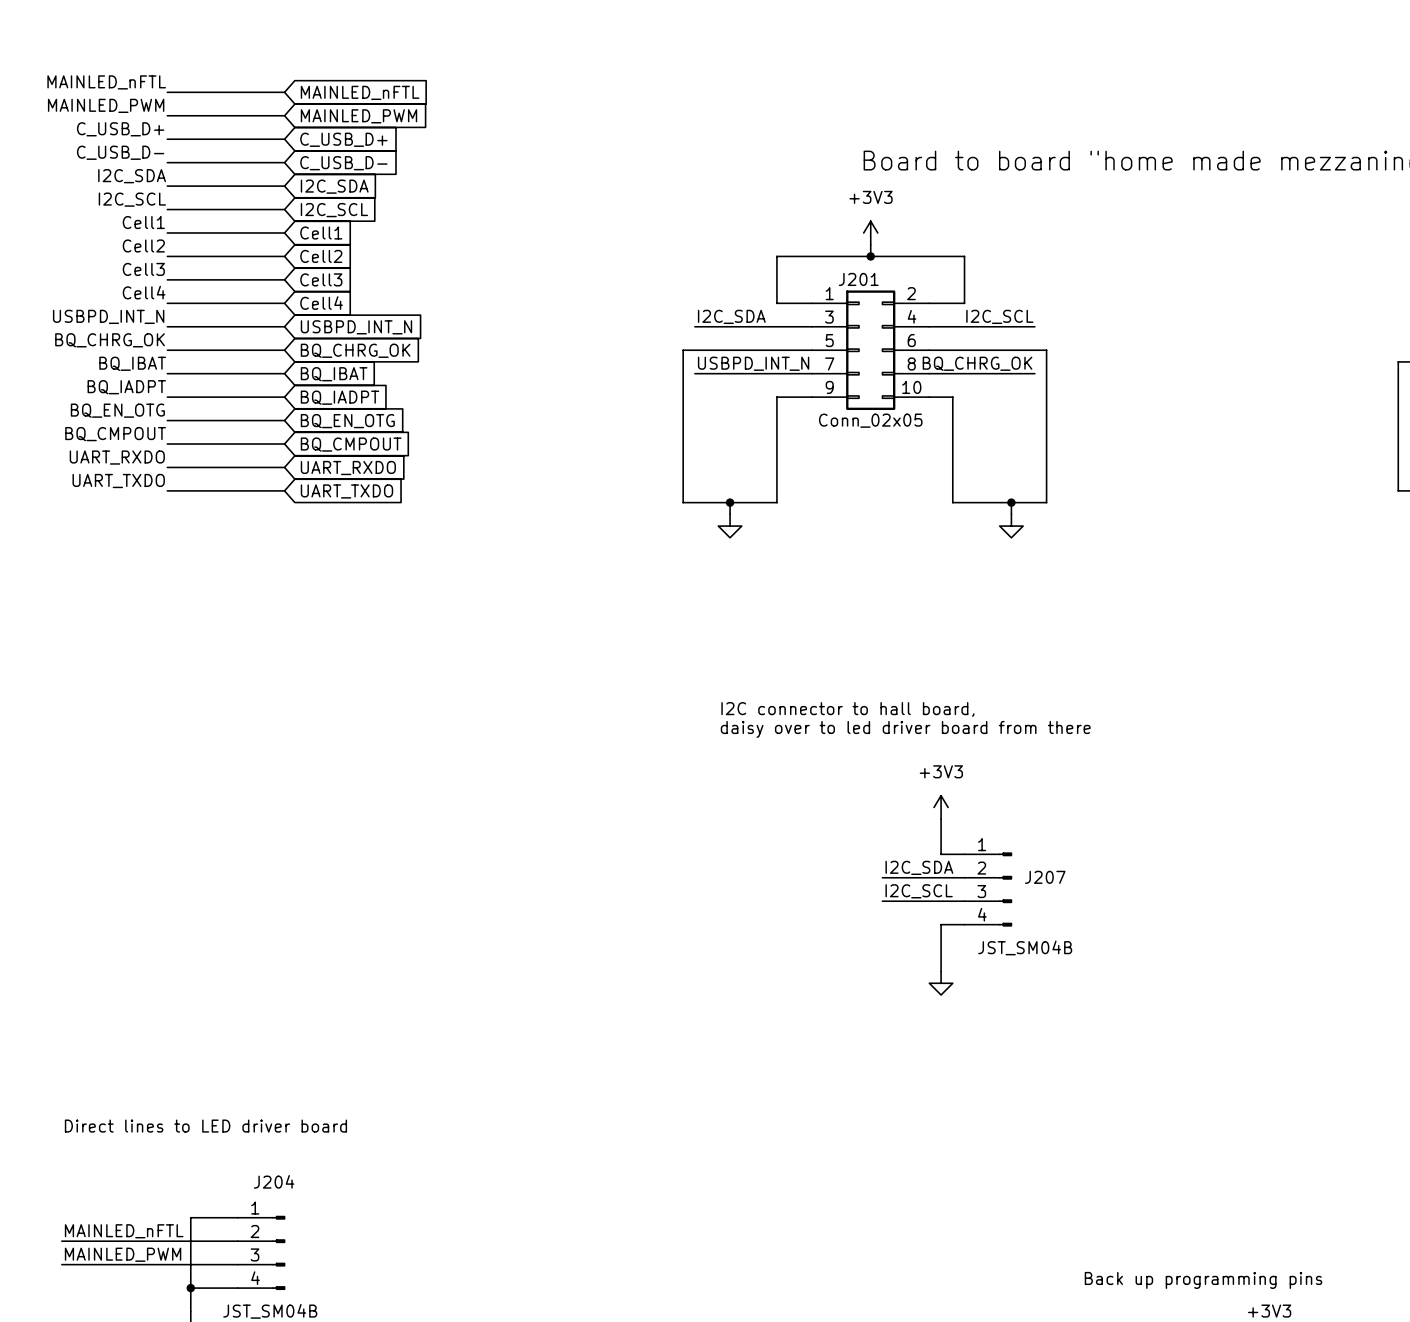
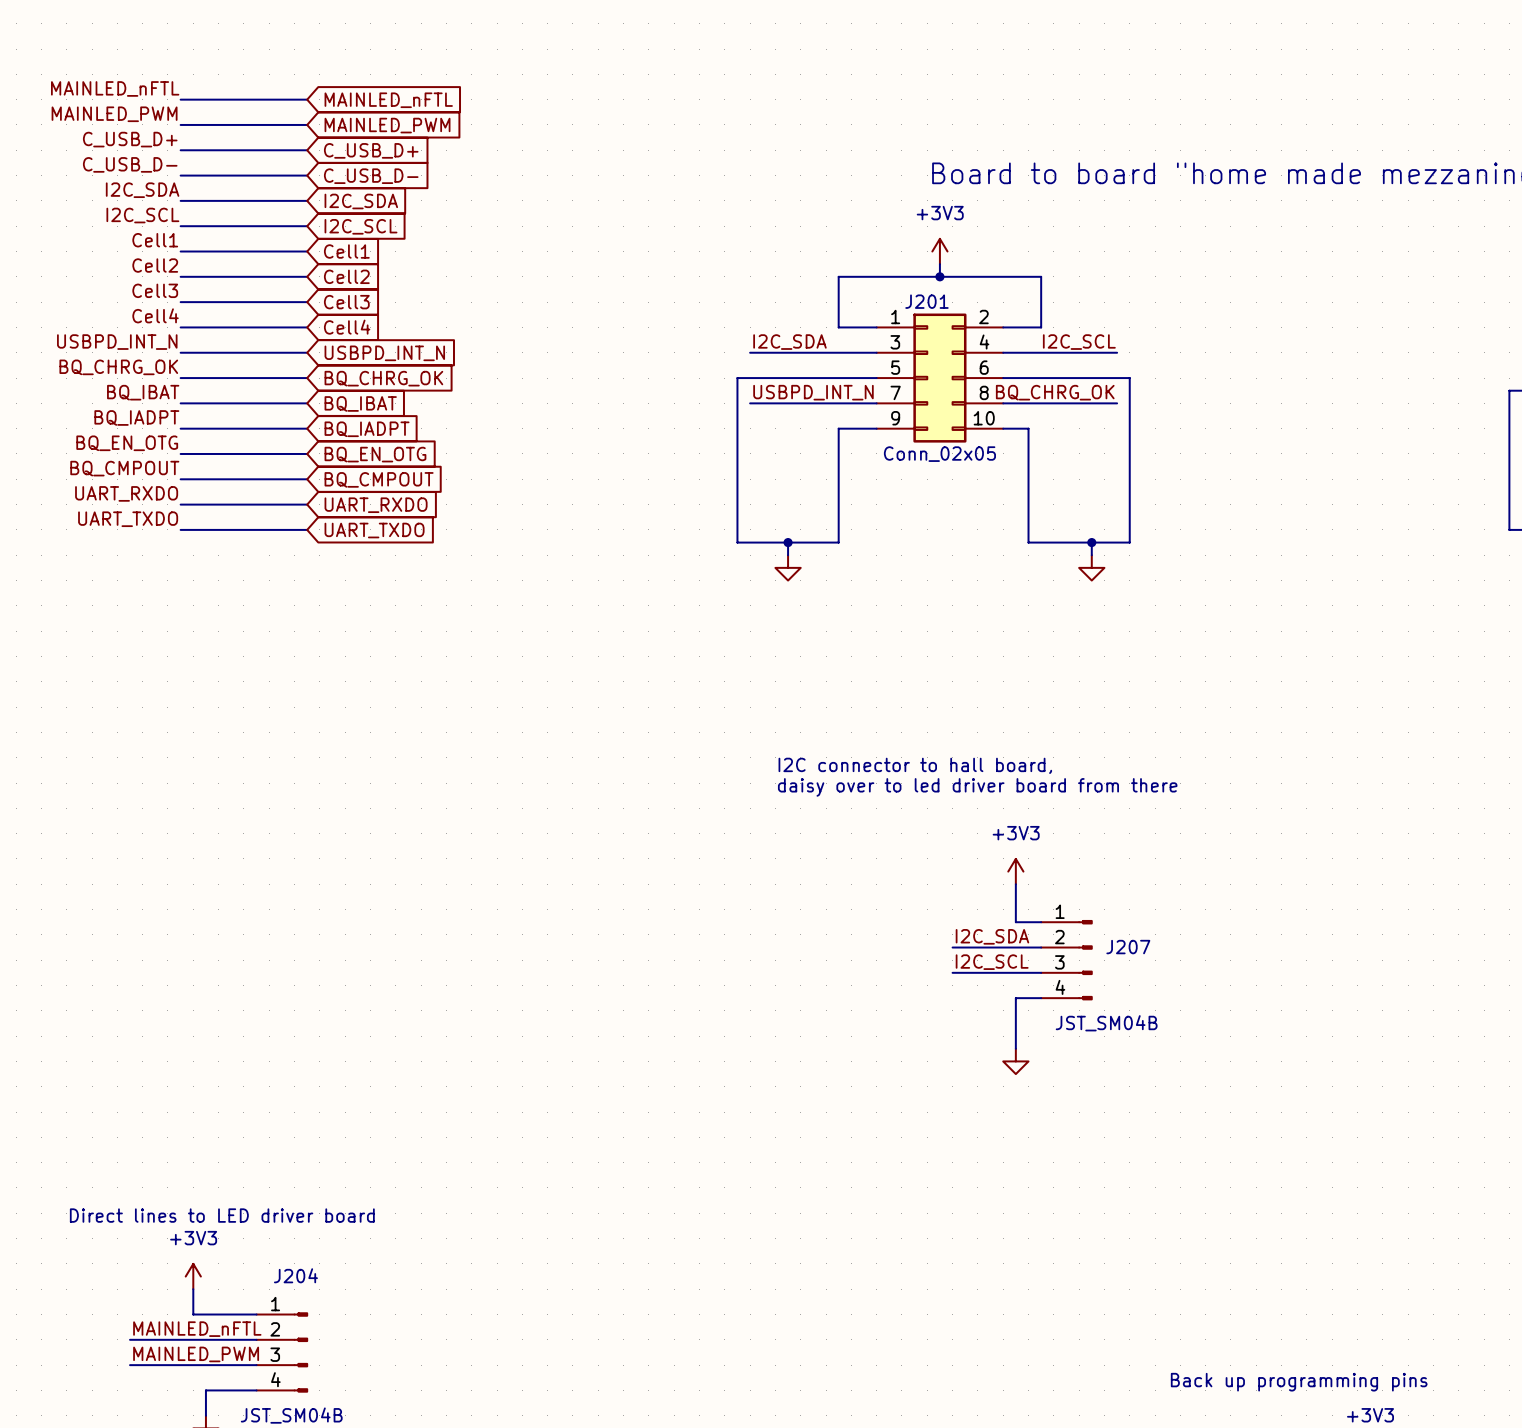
power symbol: none -> +3V3 (193, 1276)
wire: (190, 1217) (190, 1288) -> (205, 1314) (193, 1314) (193, 1289)
label position: MAINLED_nFTL (124, 1231) -> MAINLED_nFTL (197, 1329)
wire: (61, 1241) (120, 1241) -> none
label position: MAINLED_PWM (123, 1254) -> MAINLED_PWM (196, 1354)
wire: (61, 1264) (120, 1264) -> none
junction: (190, 1288) -> none

